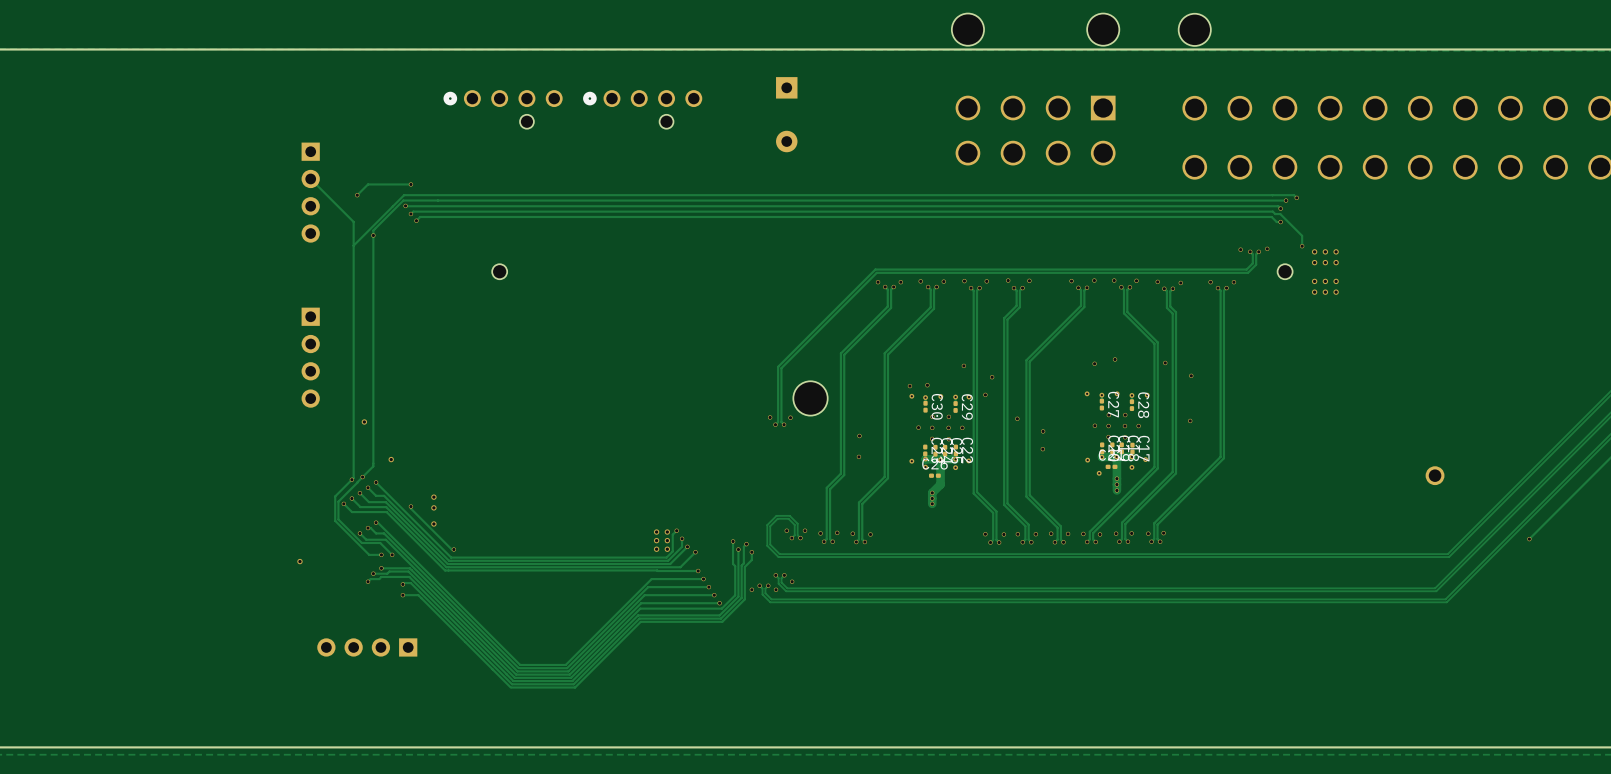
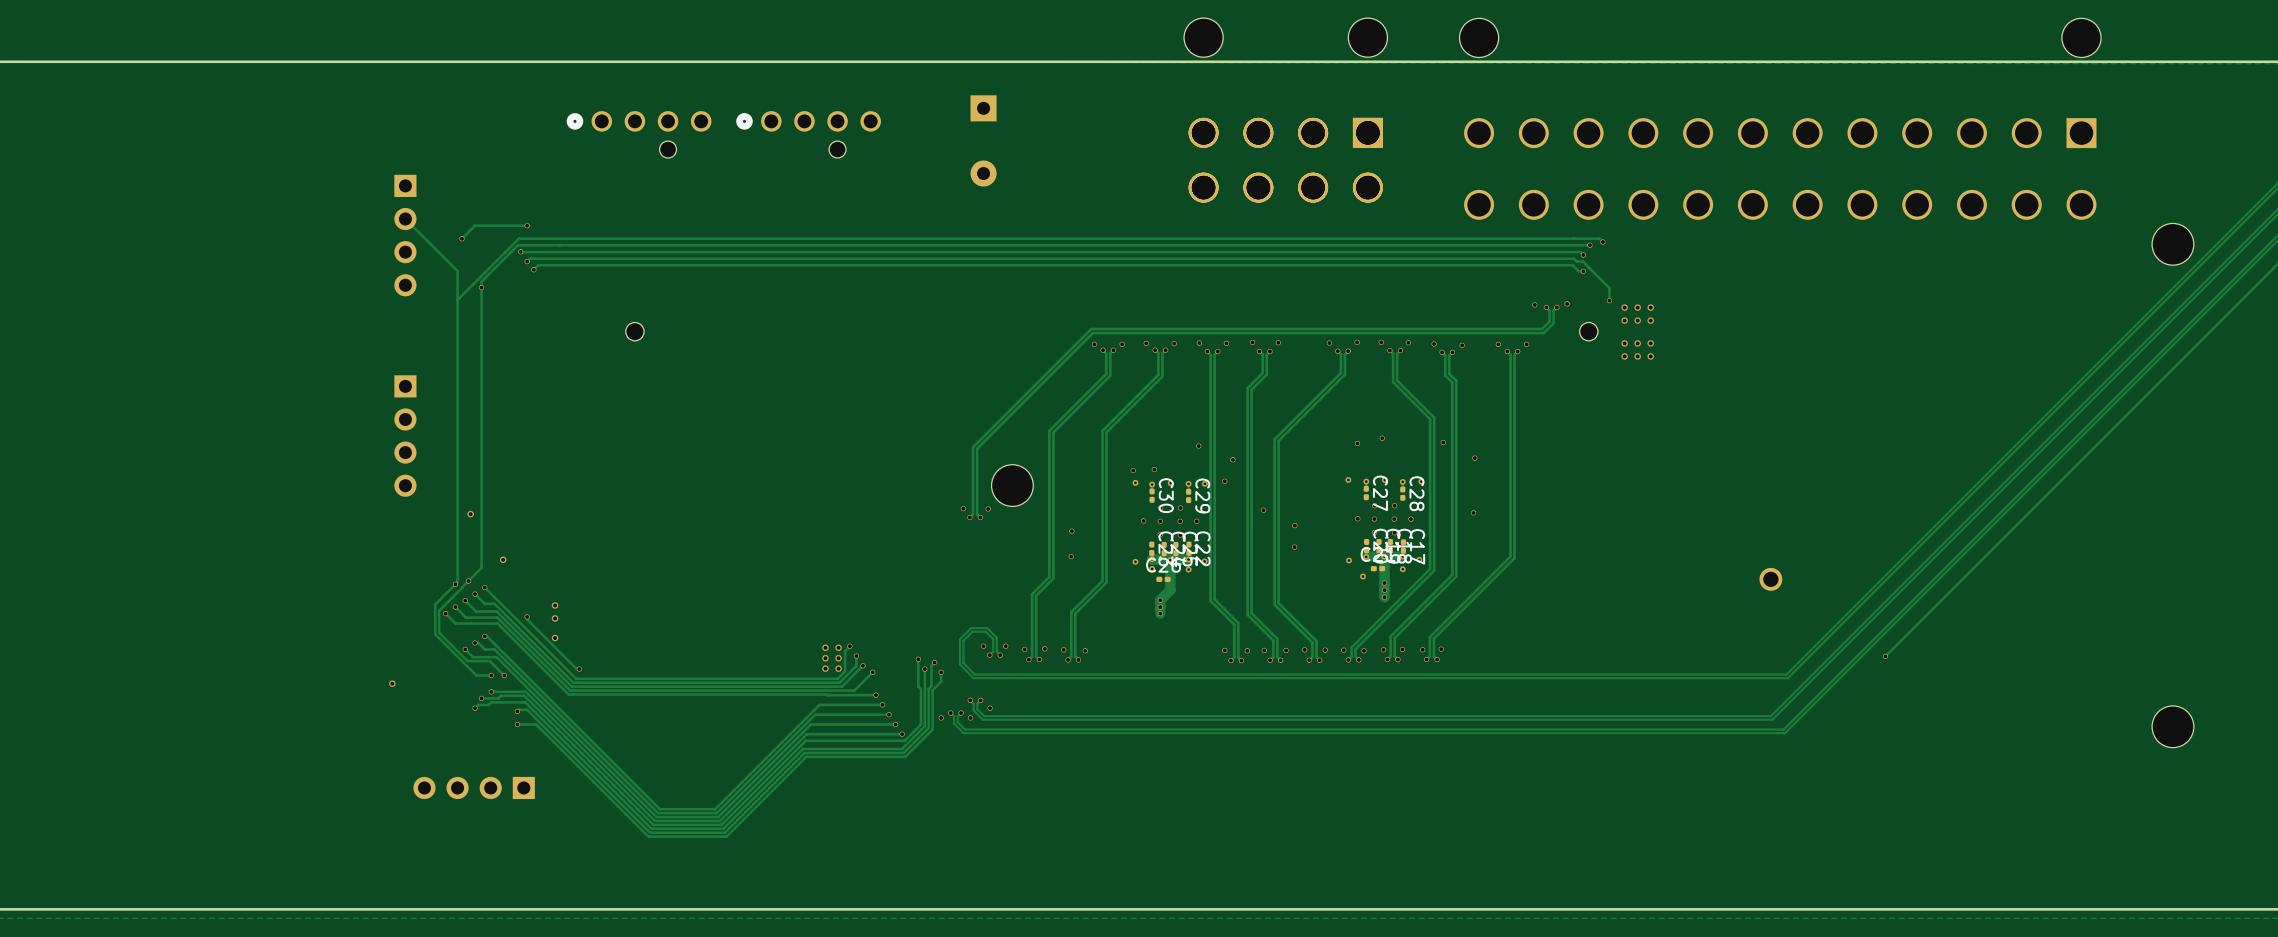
part: none -> (1285, 160)

